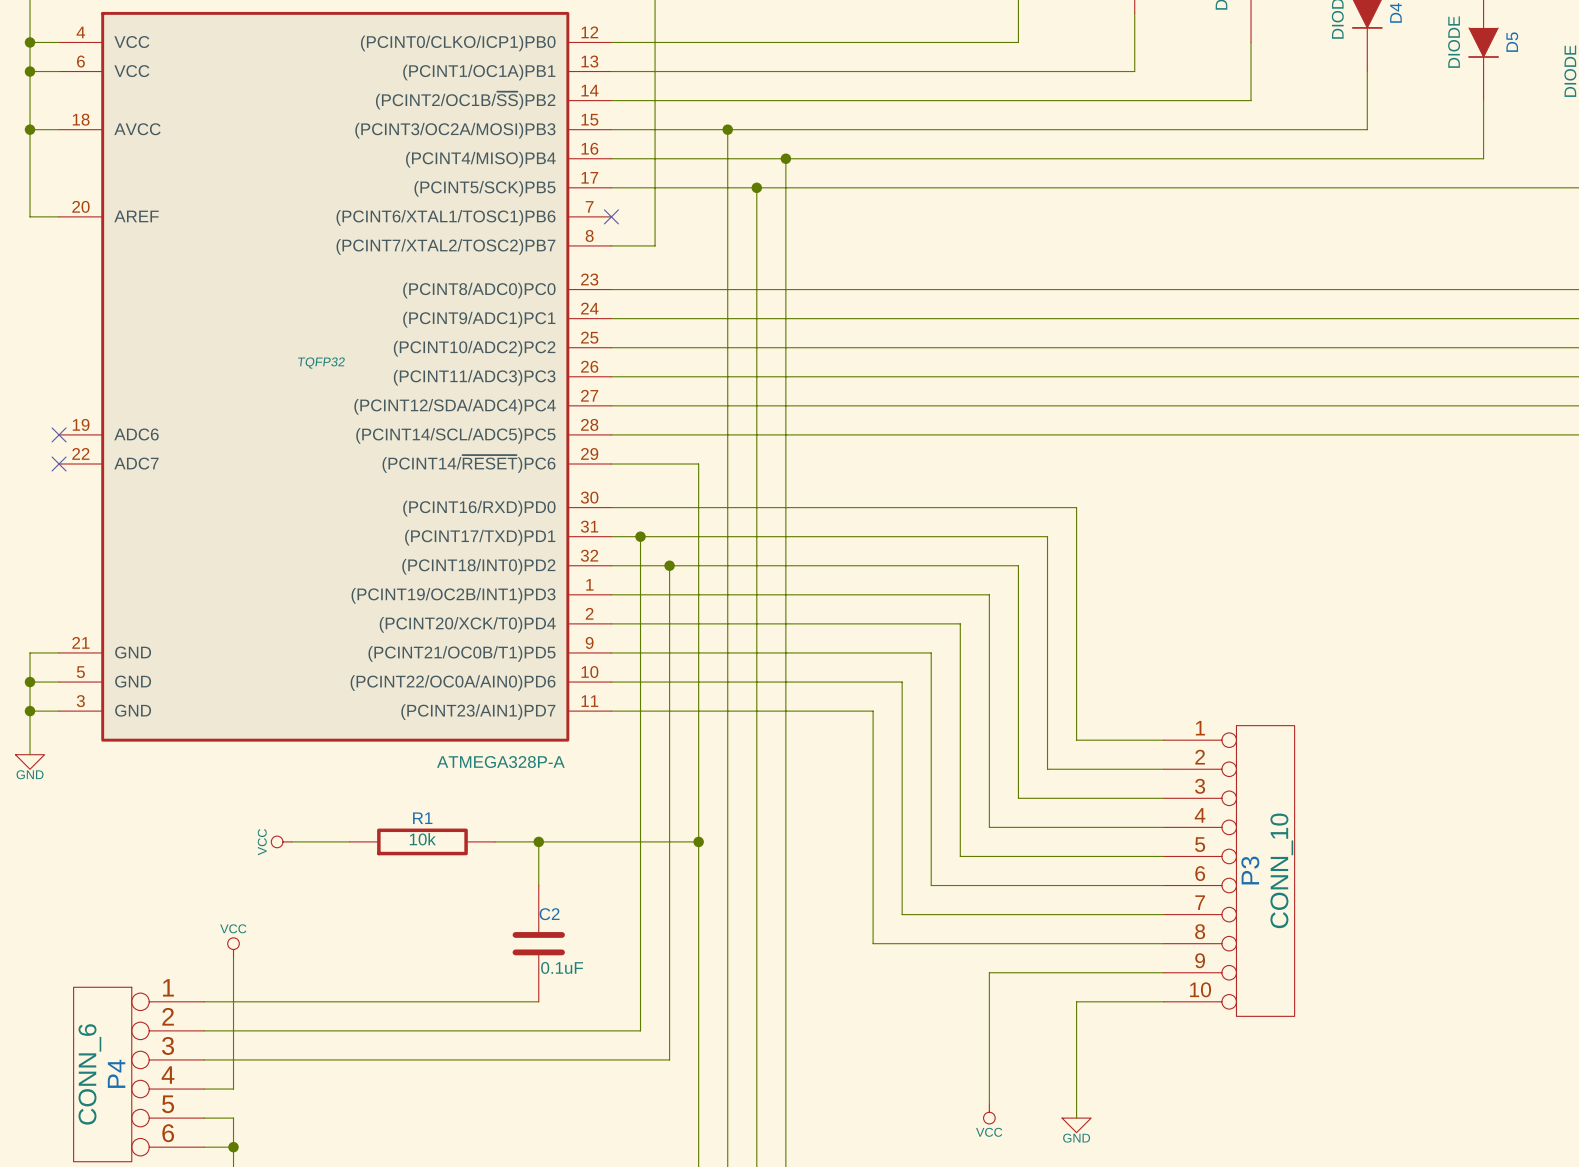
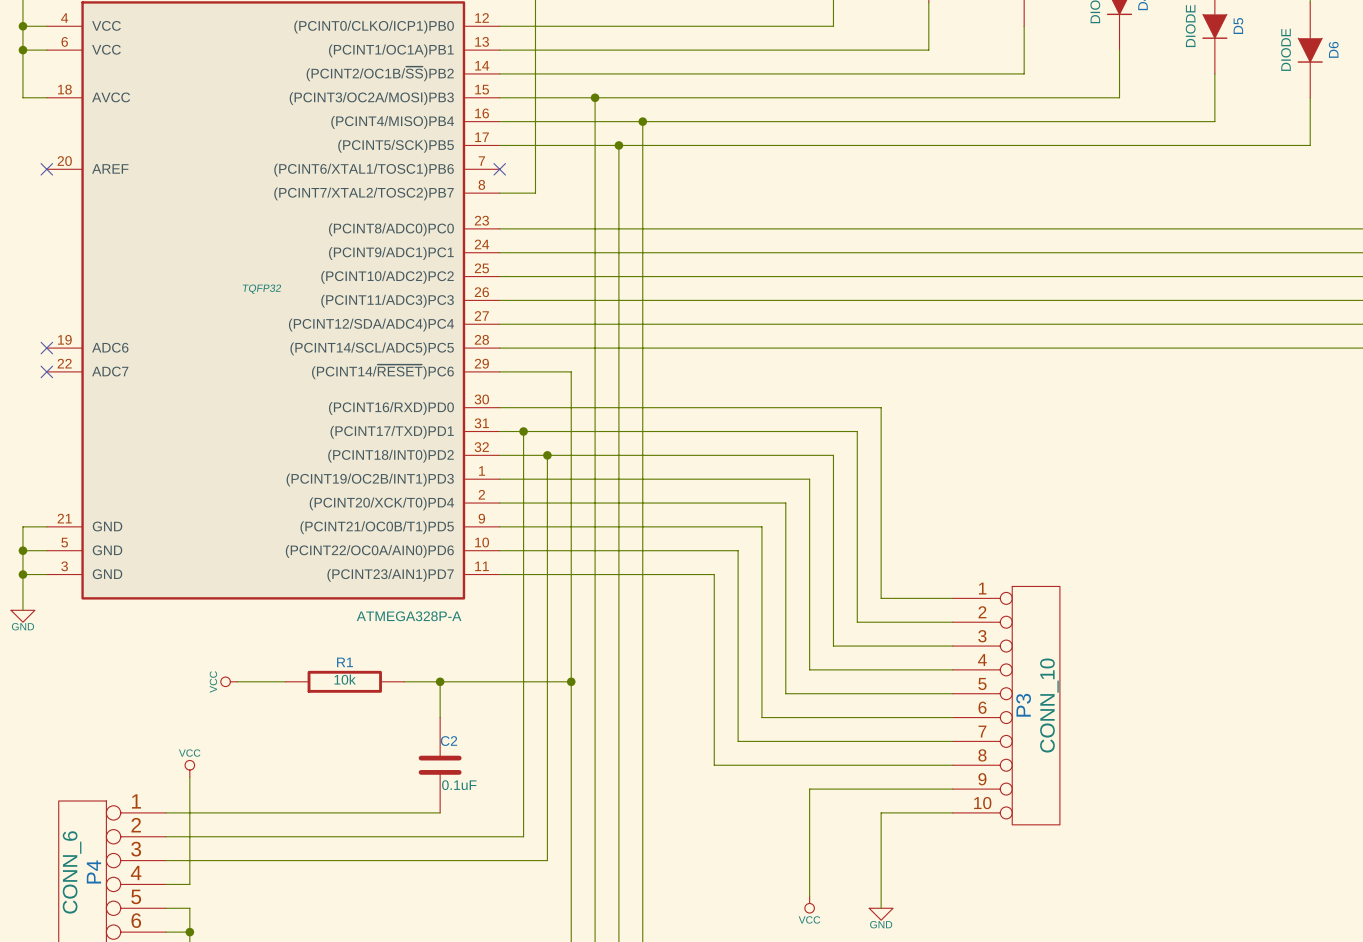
wire: (30, 129) (30, 216) (59, 216) -> none
junction: (30, 129) -> none
no-connect mark: none -> (46, 169)

